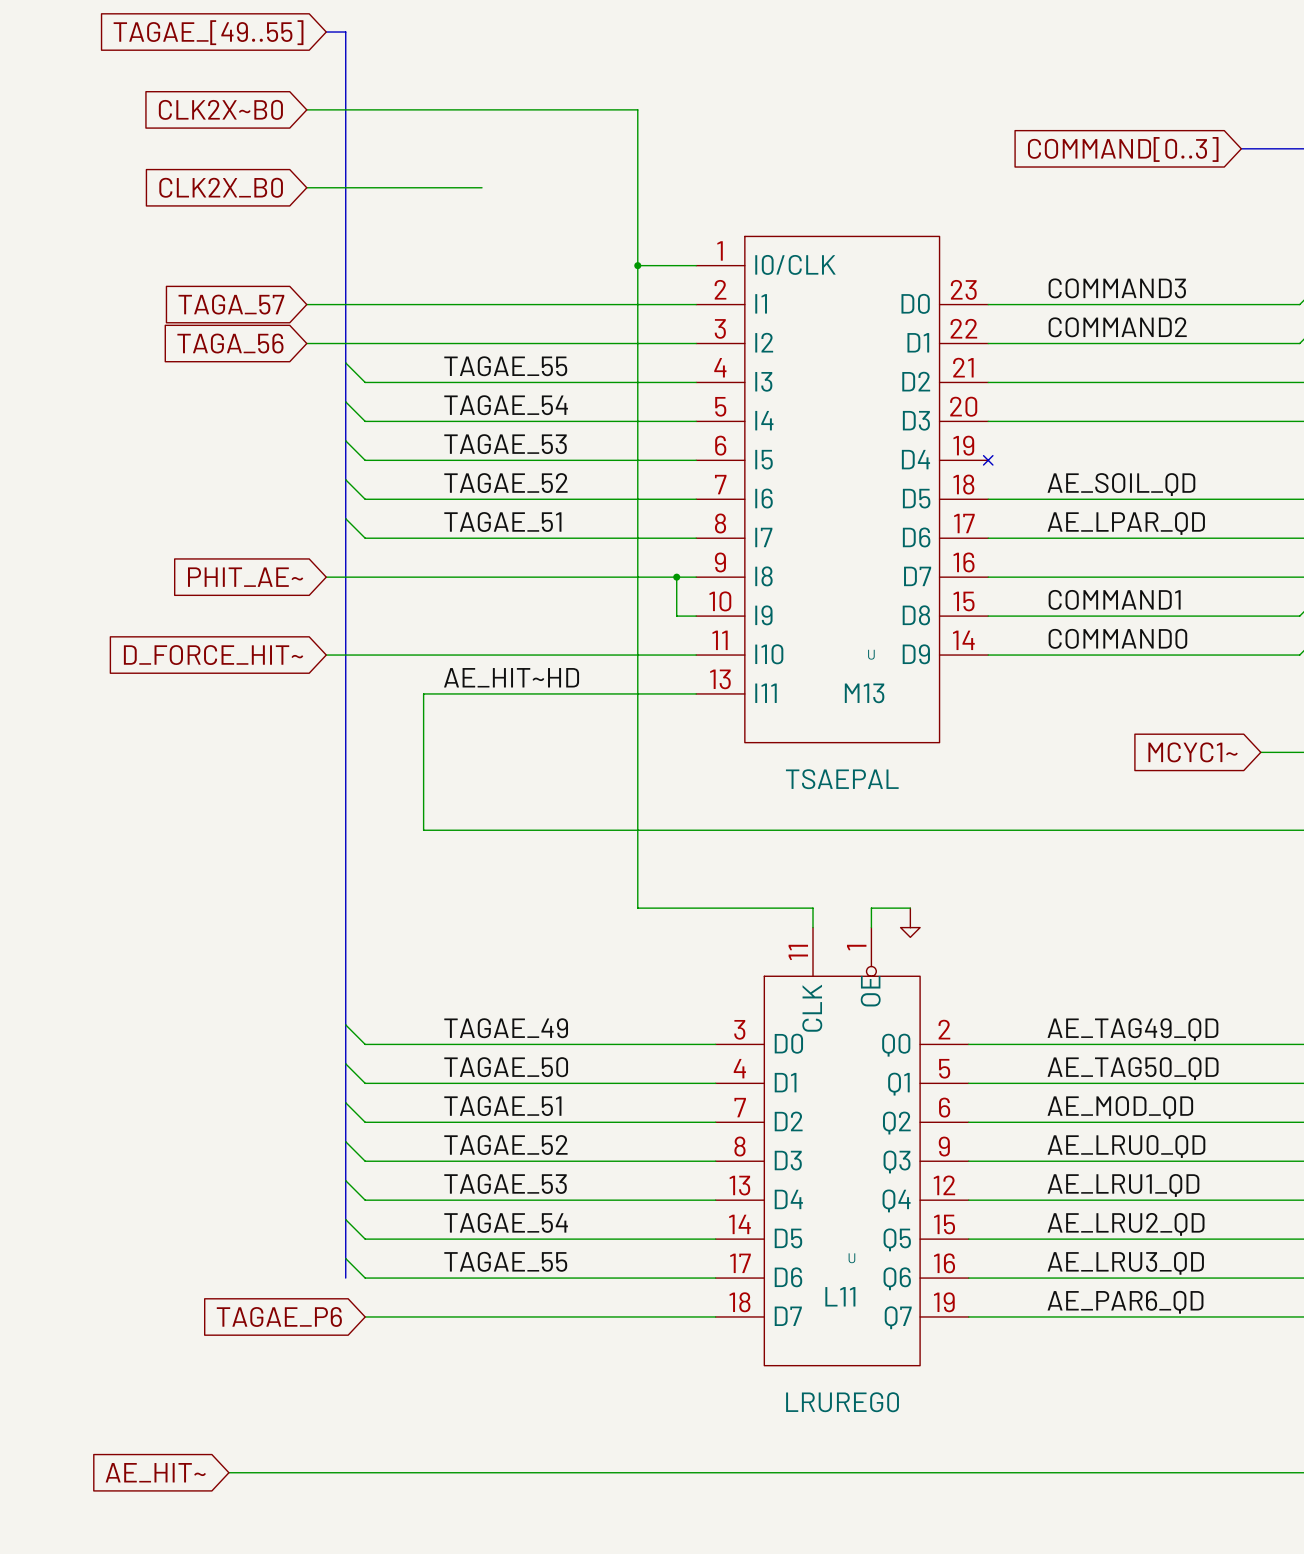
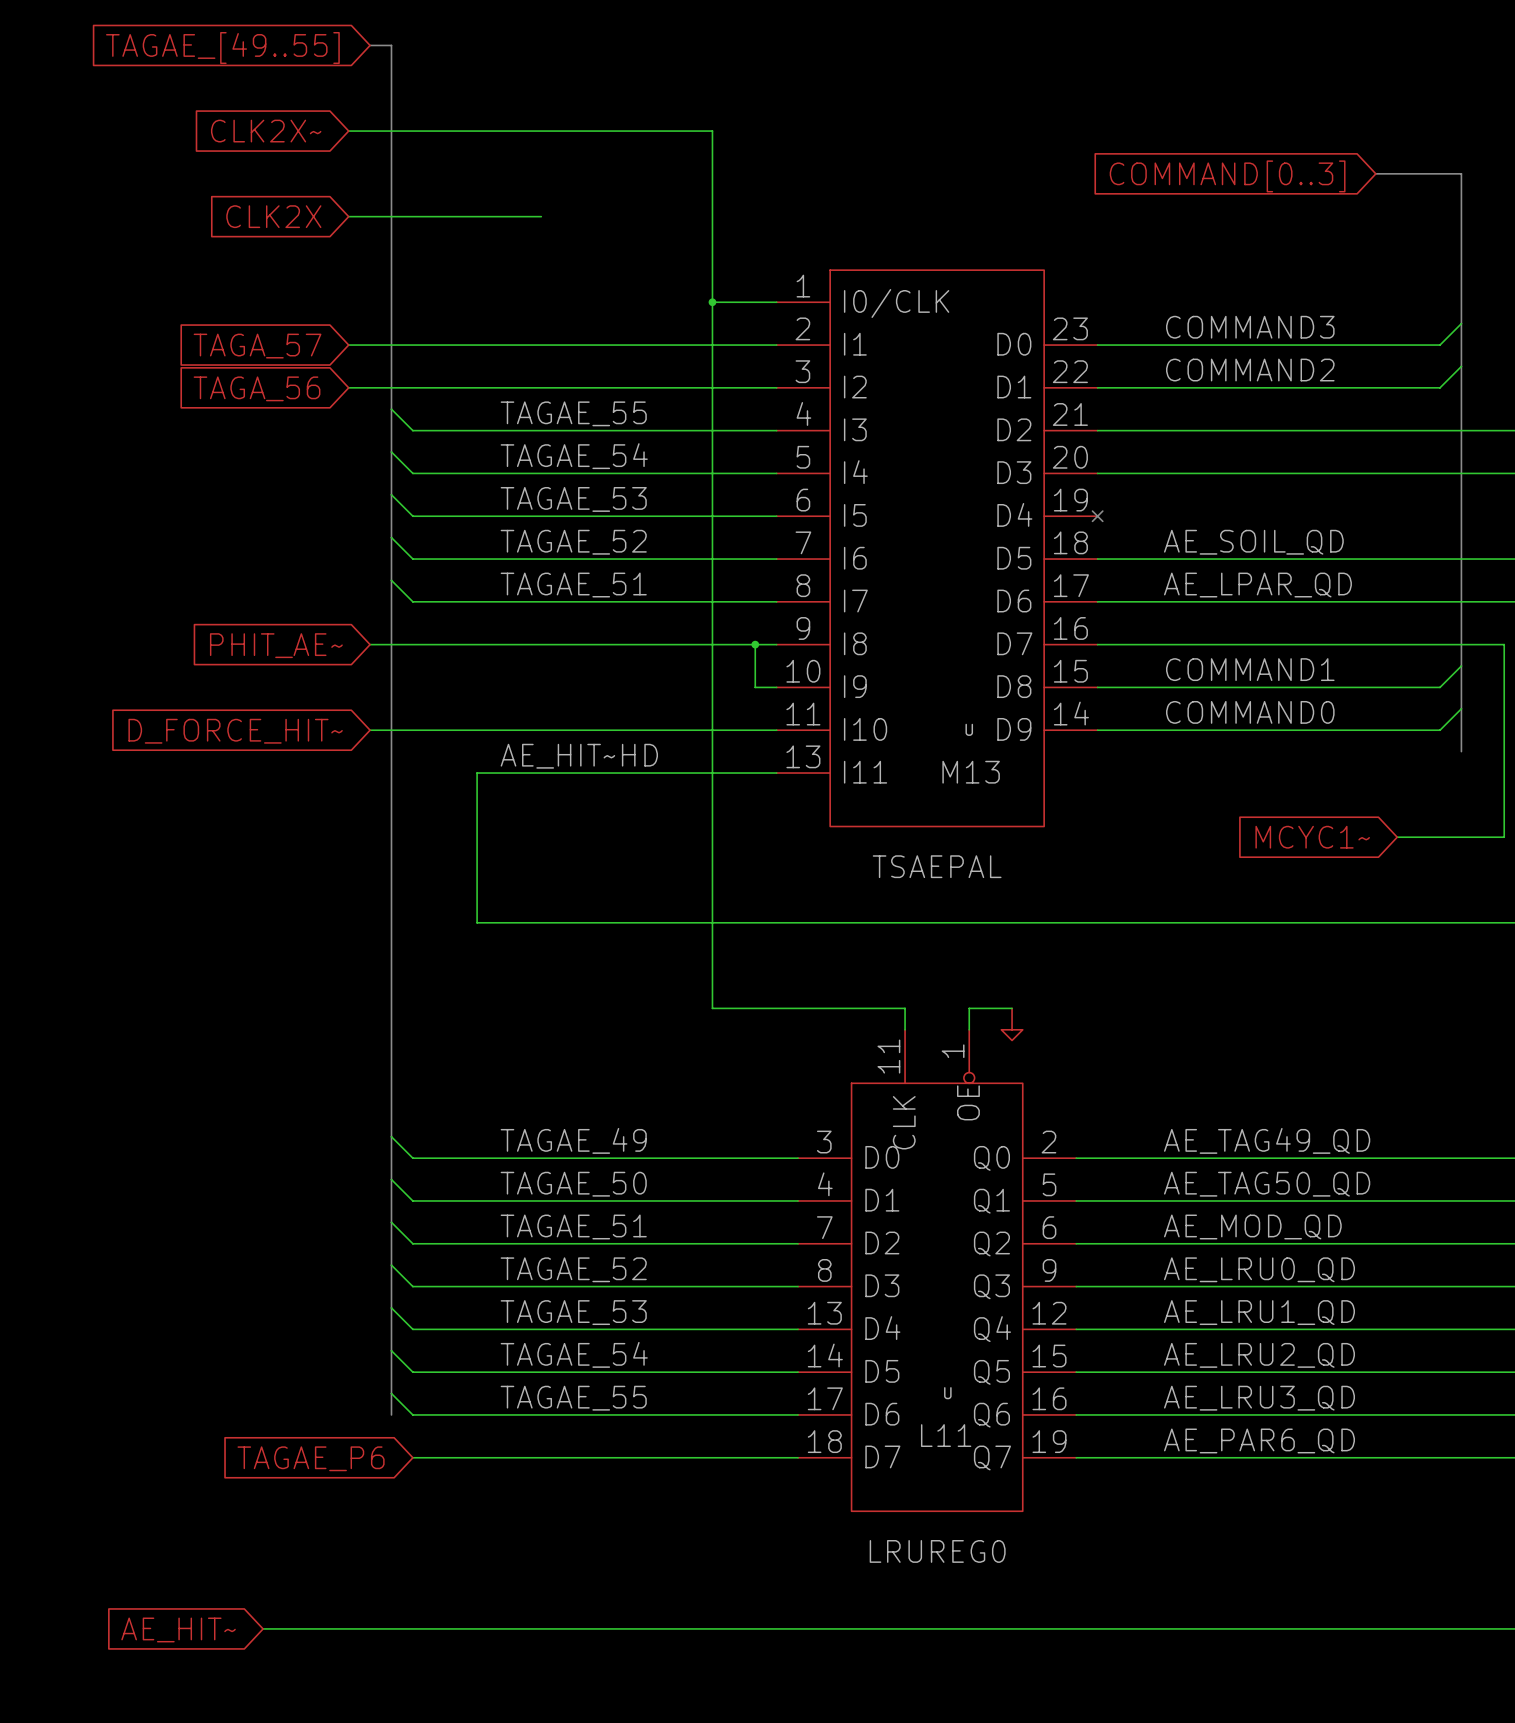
global label: CLK2X~B0 (220, 109) -> CLK2X~ (266, 131)
global label: CLK2X_B0 (221, 187) -> CLK2X (273, 216)

